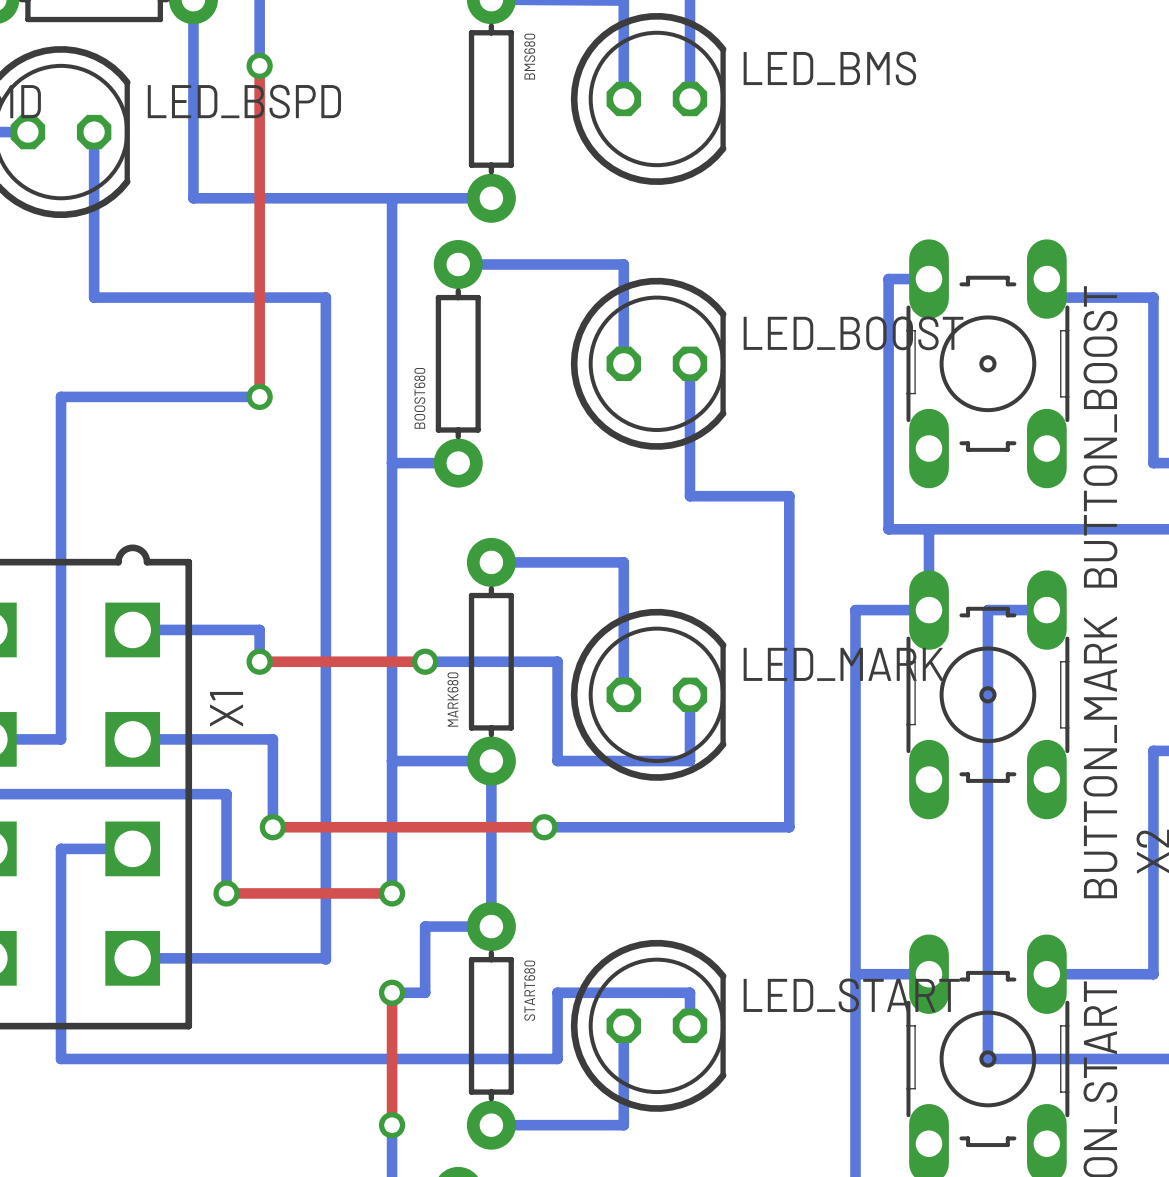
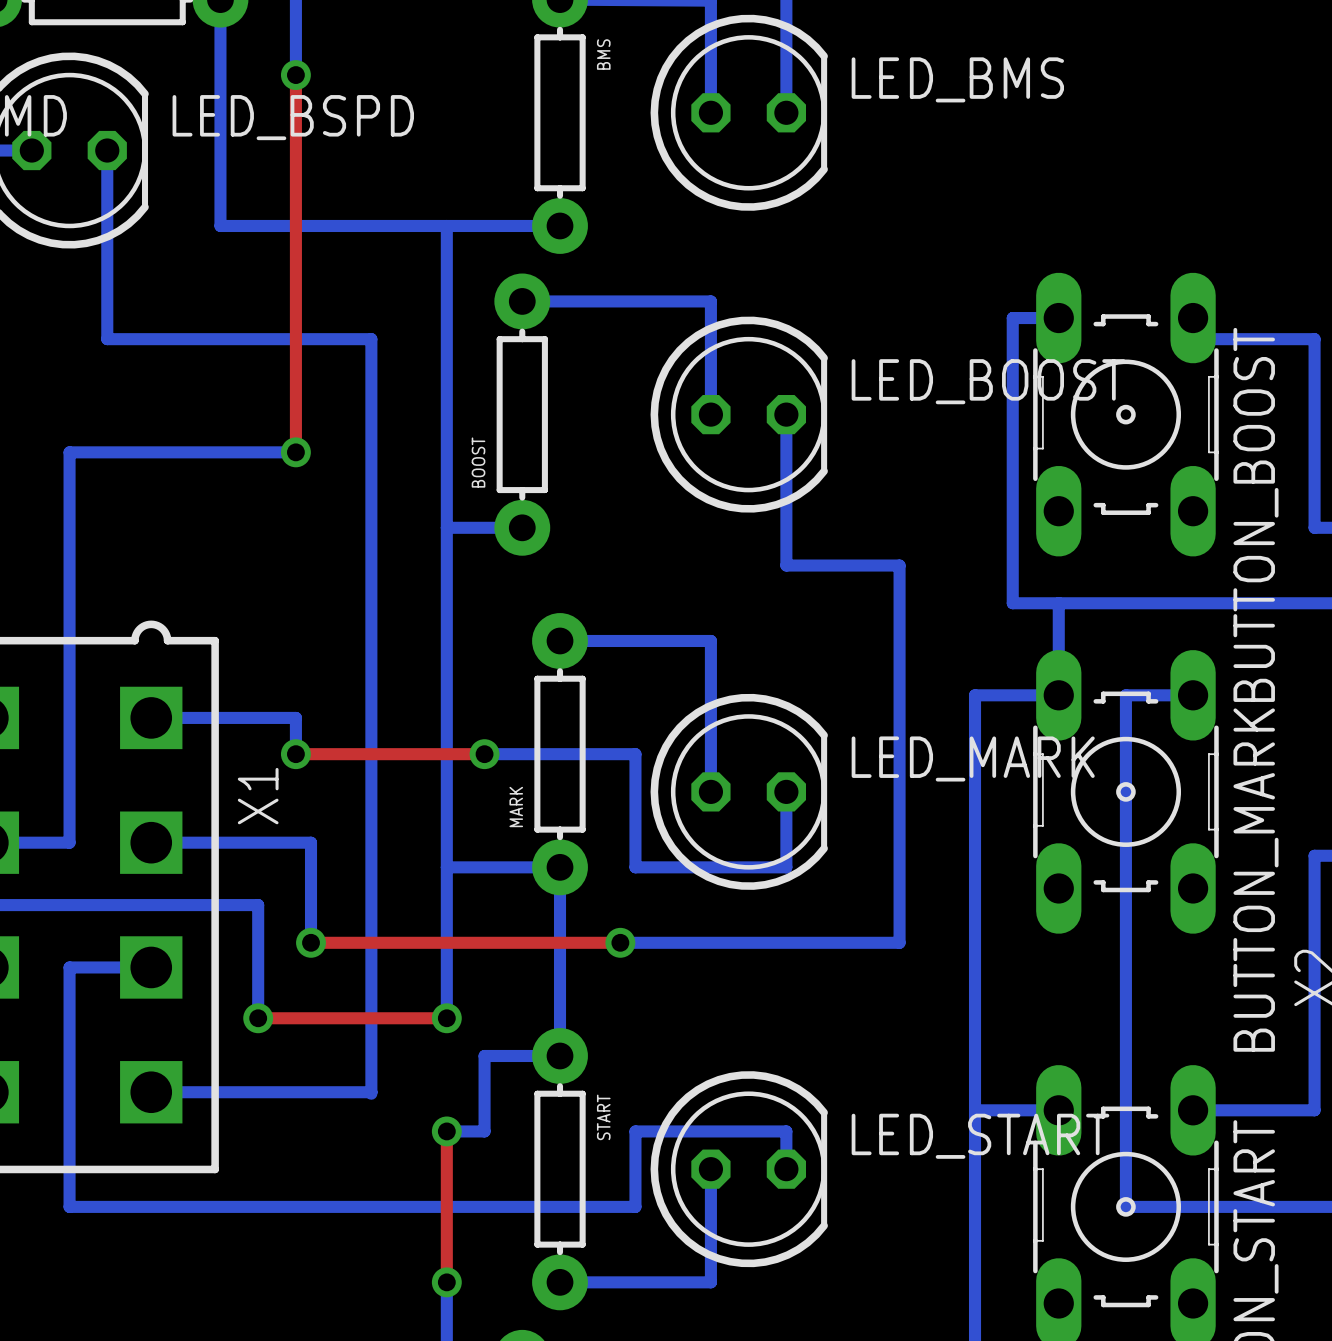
BMS680 name: BMS680 (529, 56) -> BMS (603, 54)
BOOST680 name: BOOST680 (419, 398) -> BOOST (478, 462)
MARK680 name: MARK680 (452, 699) -> MARK (516, 806)
START680 name: START680 (529, 990) -> START (603, 1117)

